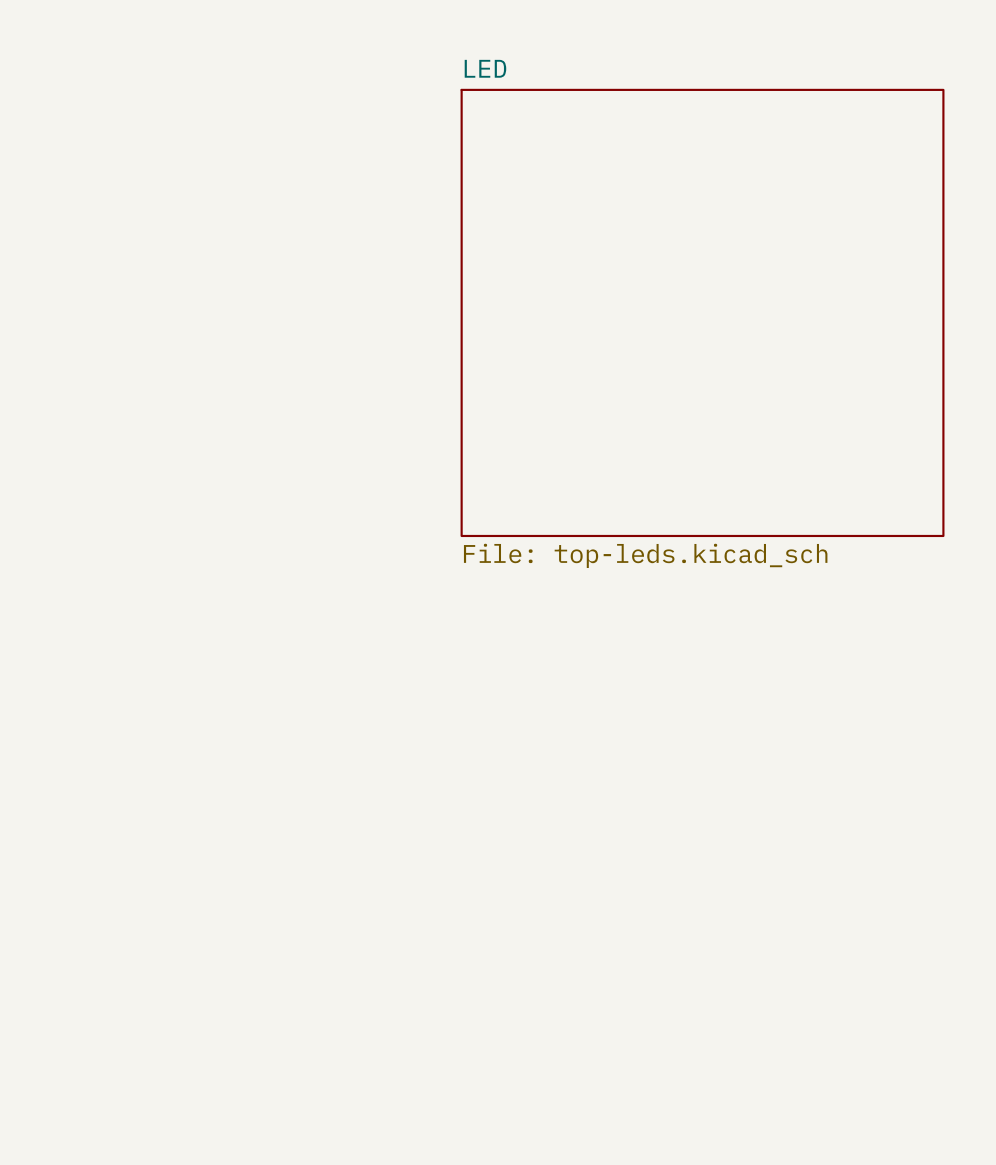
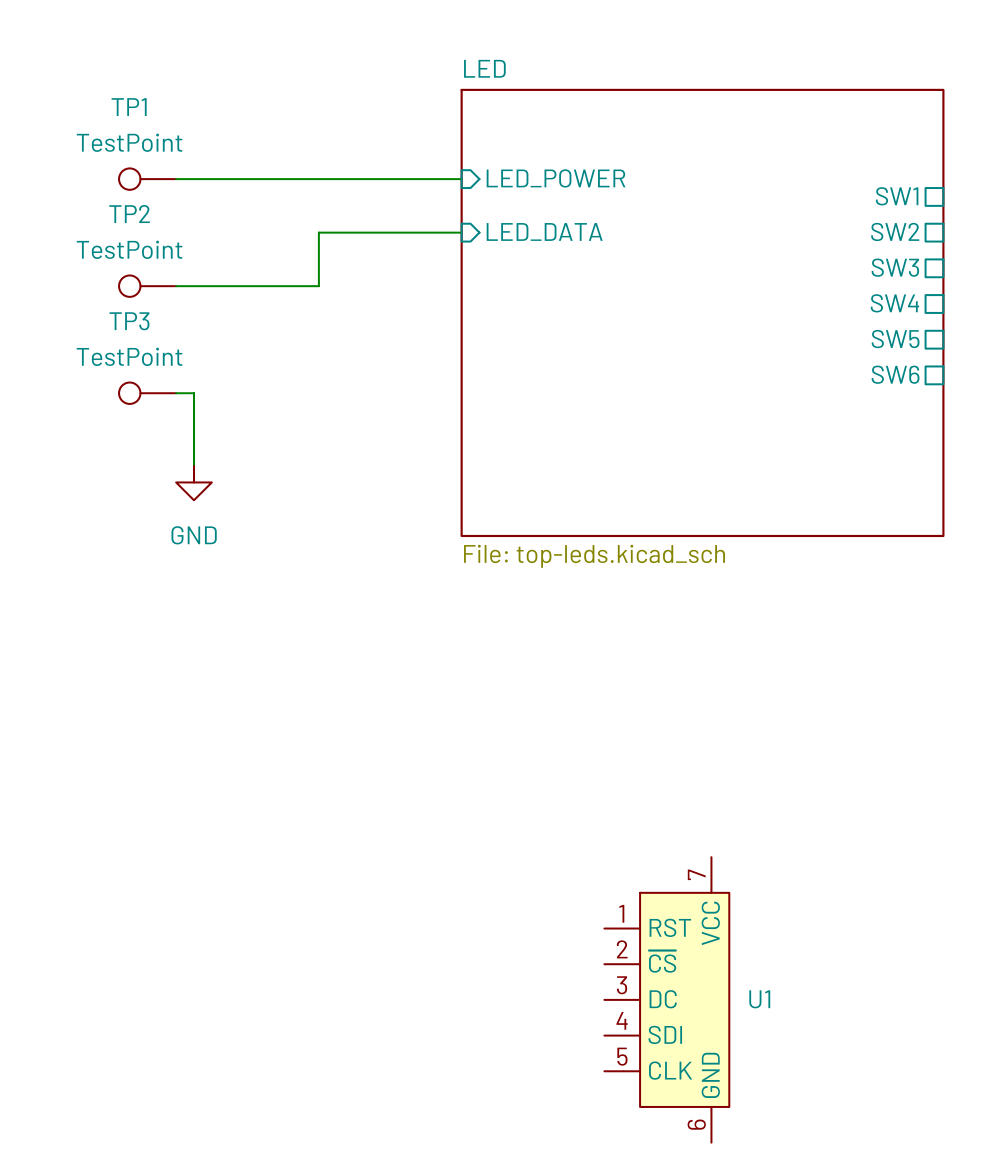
TP1: none -> TestPoint (147, 179)
wire: none -> (176, 179) (461, 179)
sheet pin: none -> LED_POWER (556, 178)
sheet pin: none -> SW1 (897, 196)
sheet pin: none -> SW2 (895, 231)
wire: none -> (461, 232) (318, 232) (318, 286) (176, 286)
sheet pin: none -> LED_DATA (544, 231)
sheet pin: none -> SW3 (895, 267)
TP2: none -> TestPoint (147, 286)
sheet pin: none -> SW4 (894, 303)
sheet pin: none -> SW5 (895, 339)
sheet pin: none -> SW6 (895, 374)
TP3: none -> TestPoint (147, 393)
wire: none -> (176, 393) (193, 393) (193, 464)
power symbol: none -> GND (193, 482)
U1: none -> (666, 999)

